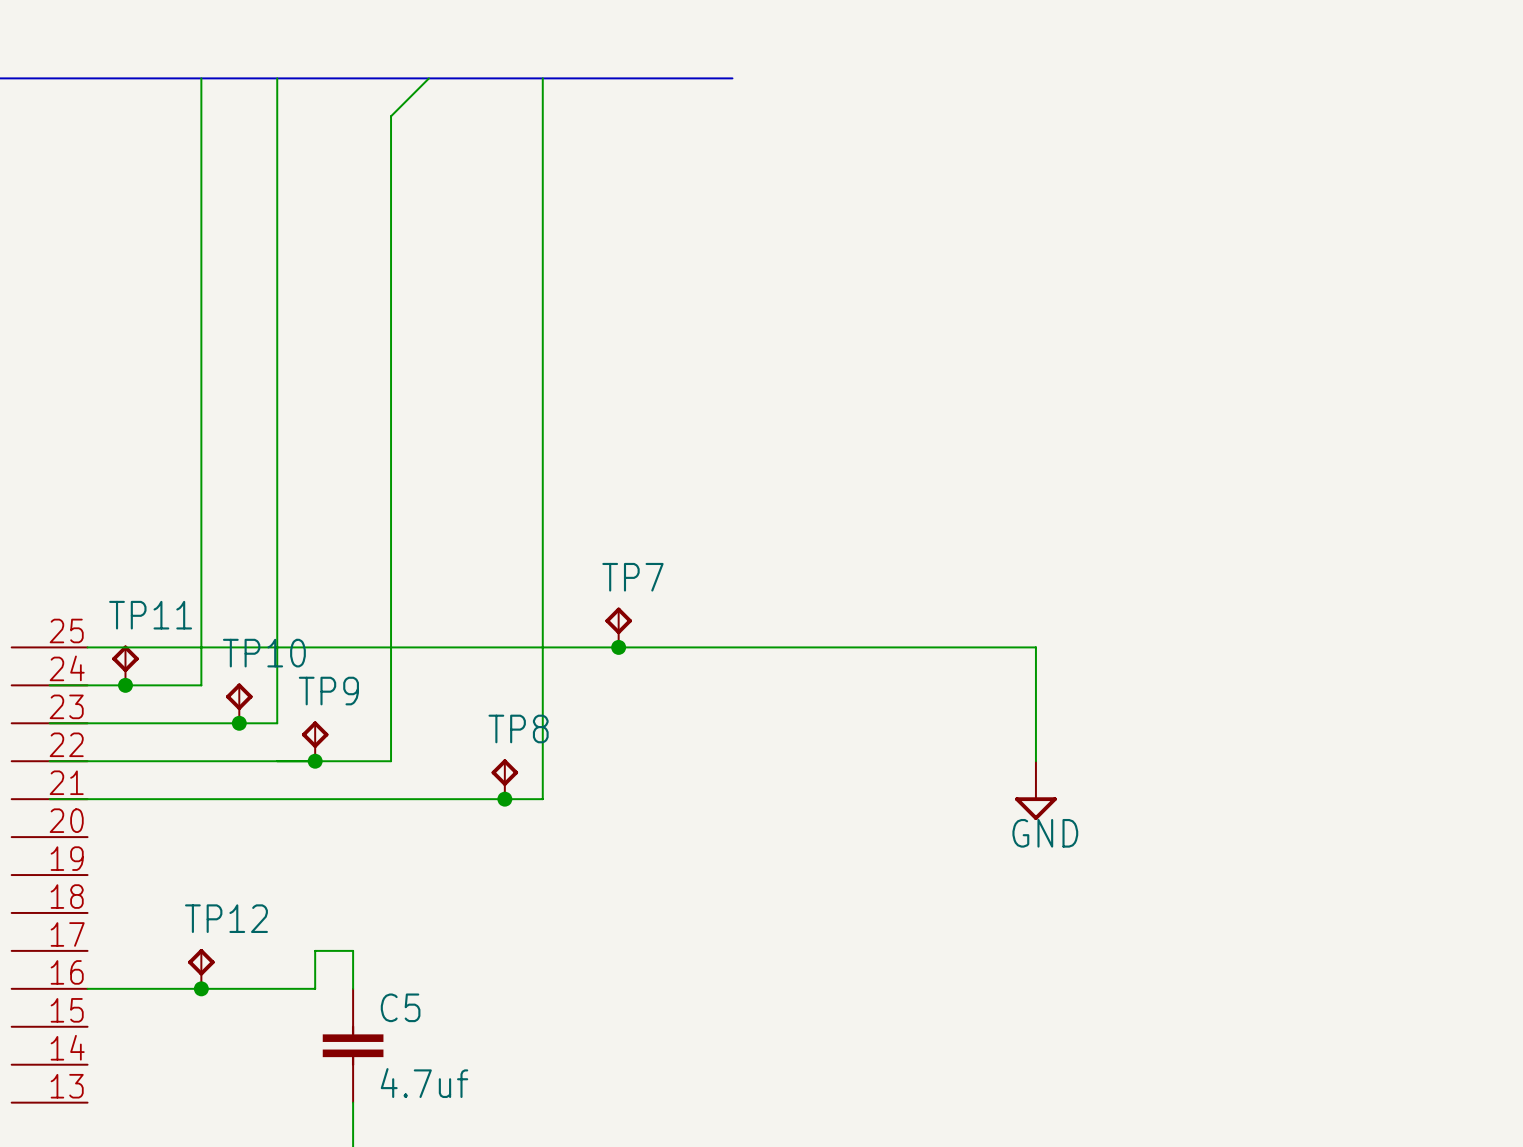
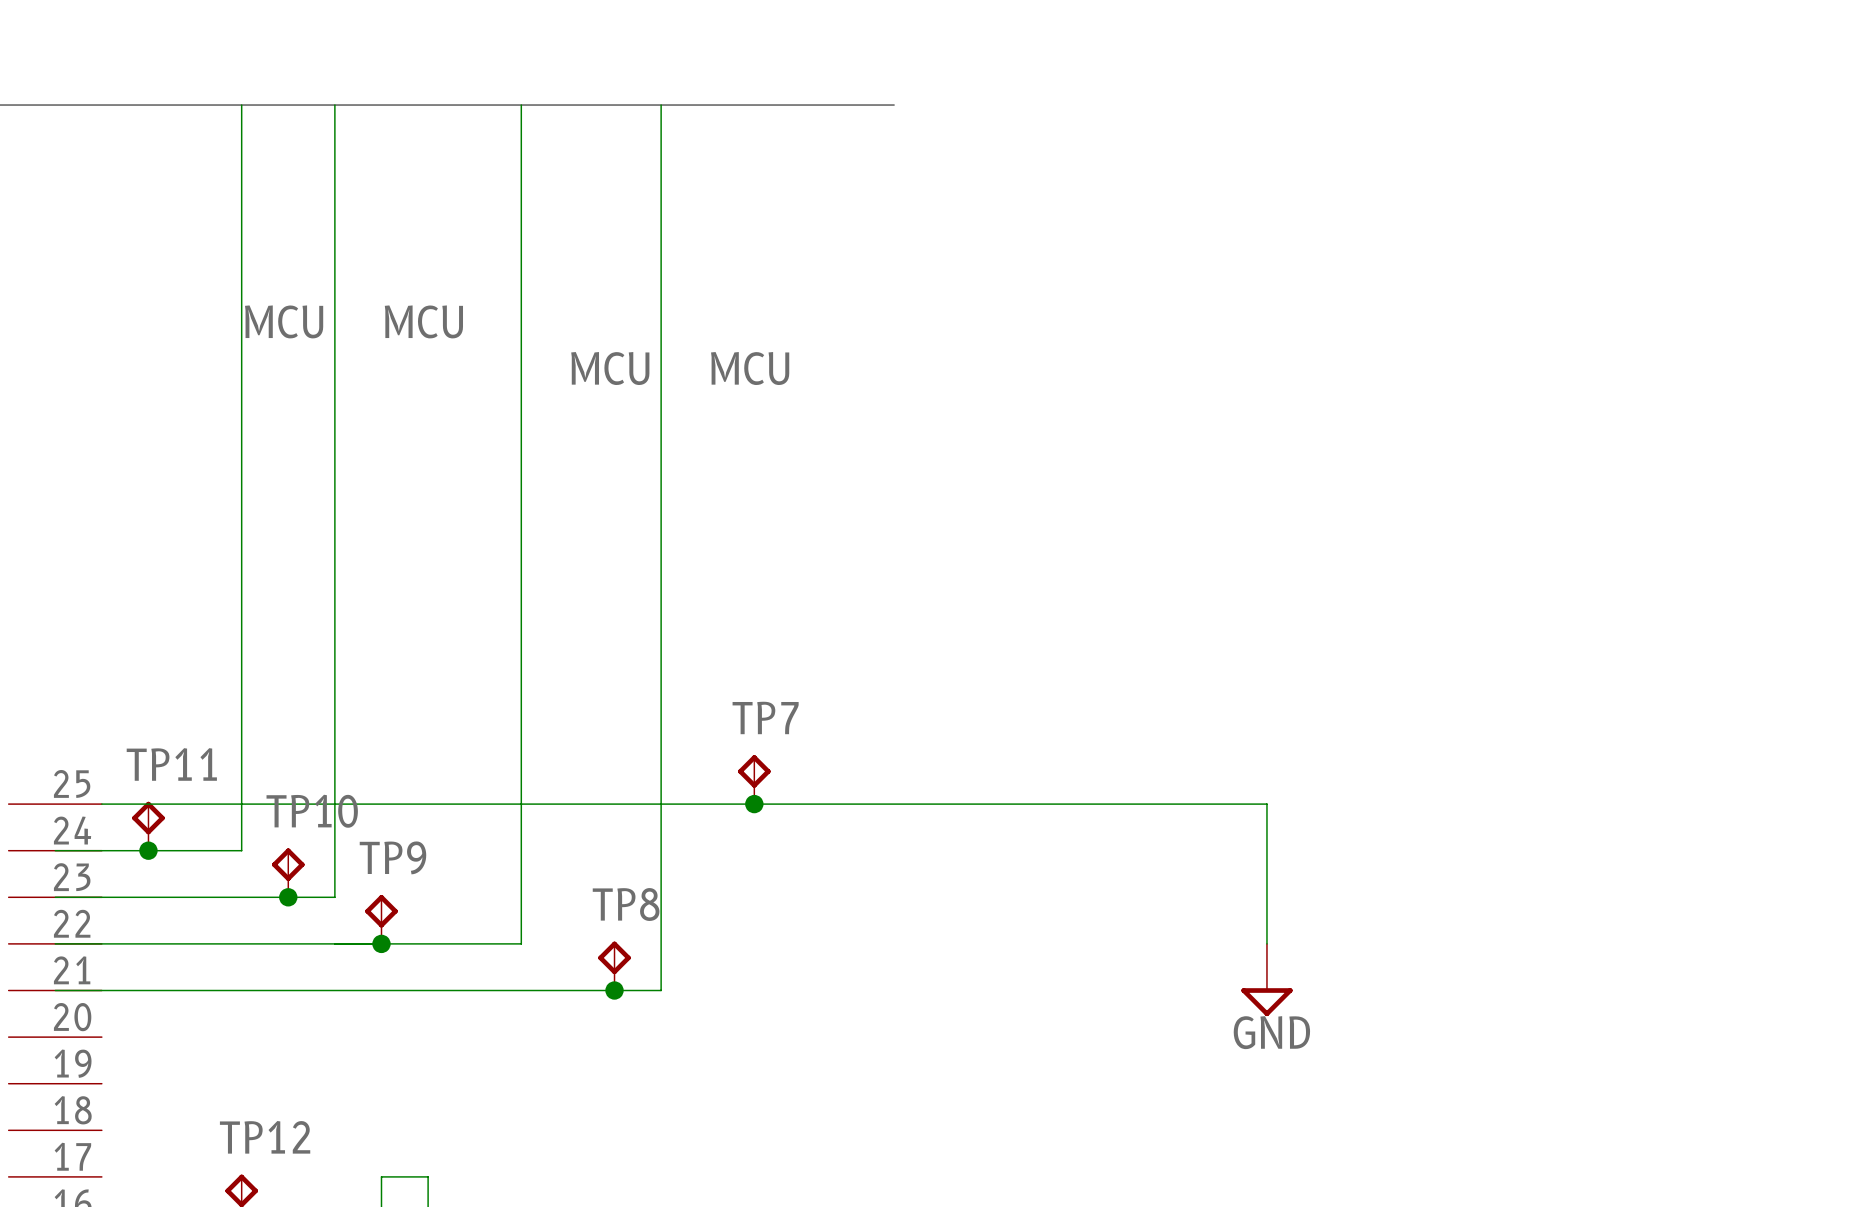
wire: (428, 78) (391, 116) (391, 761) -> (521, 105) (521, 943) (474, 943)
label: none -> MCU (284, 321)
label: none -> MCU (423, 321)
label: none -> MCU (610, 368)
label: none -> MCU (750, 368)

